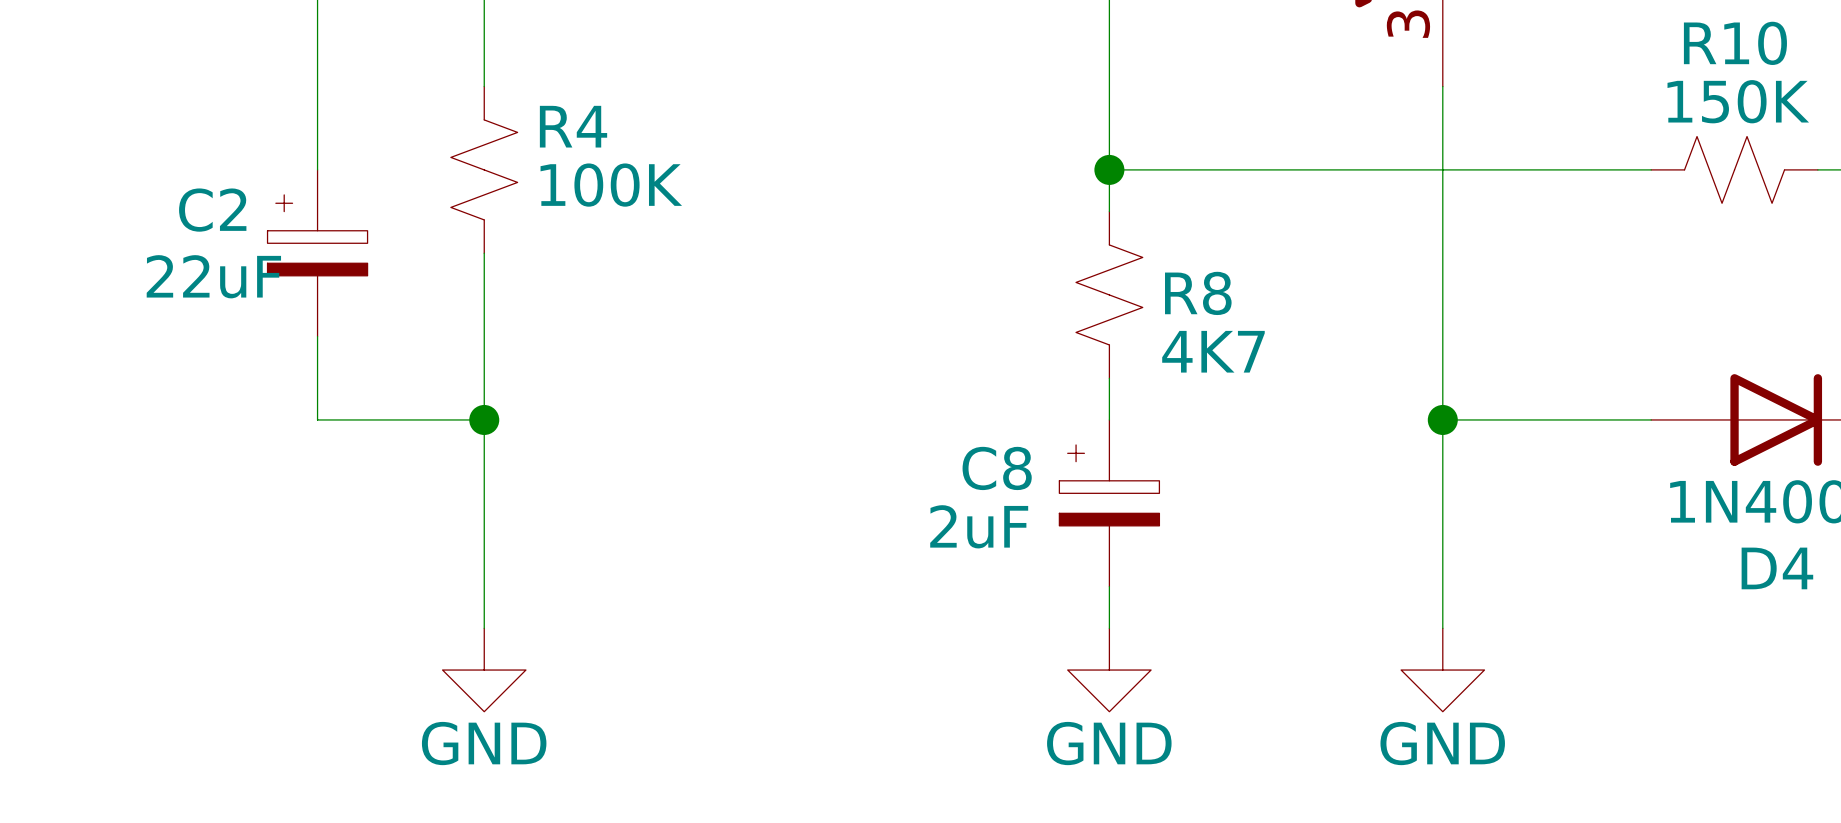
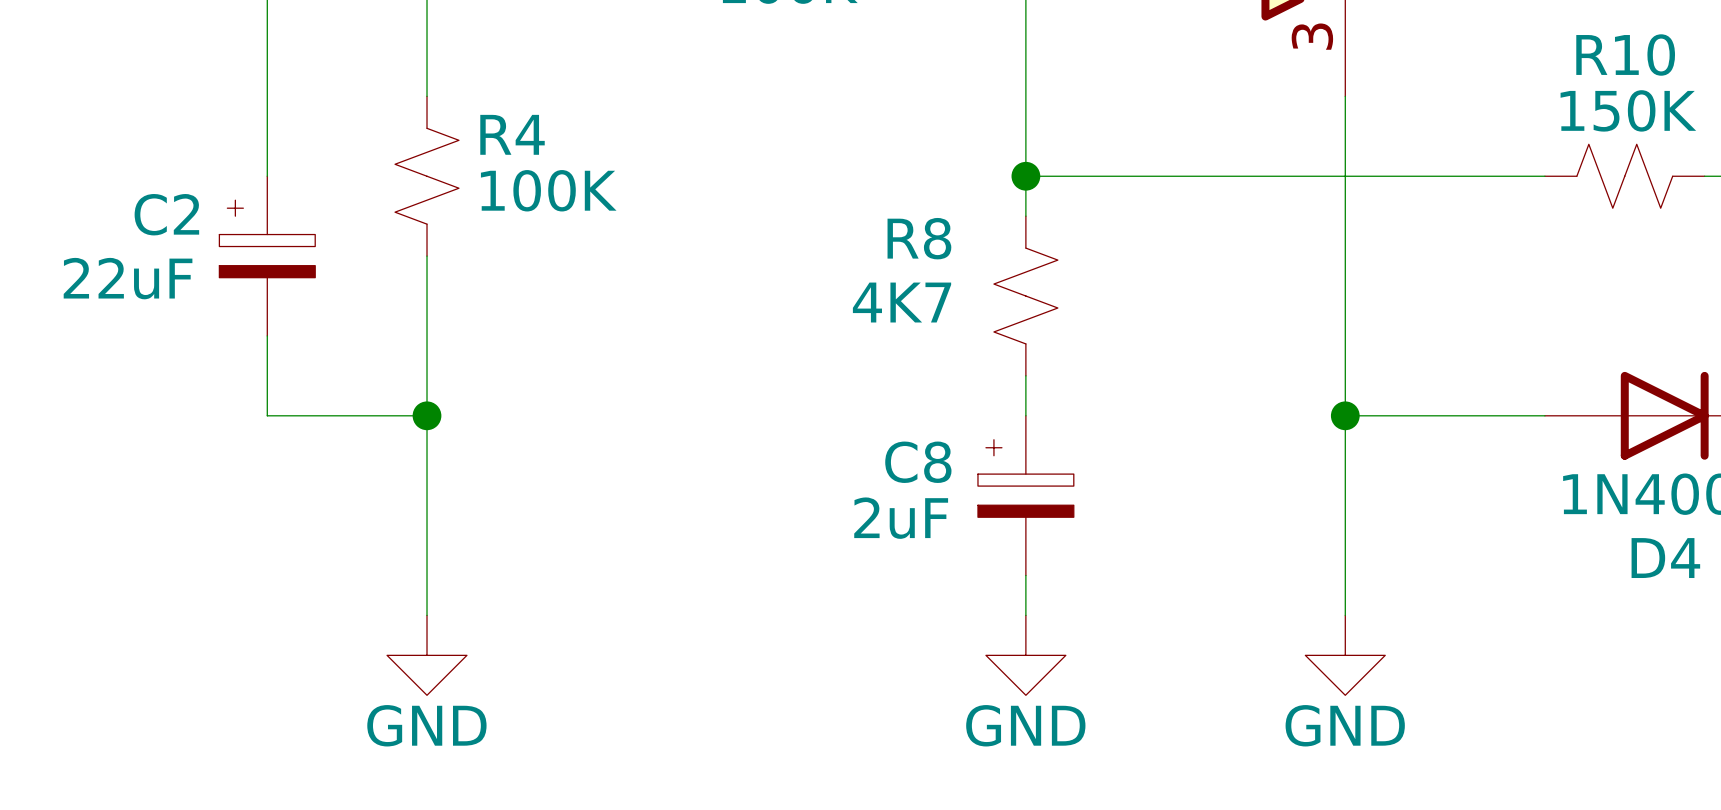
C2 value position: 22uF (213, 276) -> 22uF (128, 278)
R8 name position: R8 (1198, 293) -> R8 (919, 238)
R8 value position: 4K7 (1213, 351) -> 4K7 (902, 302)

